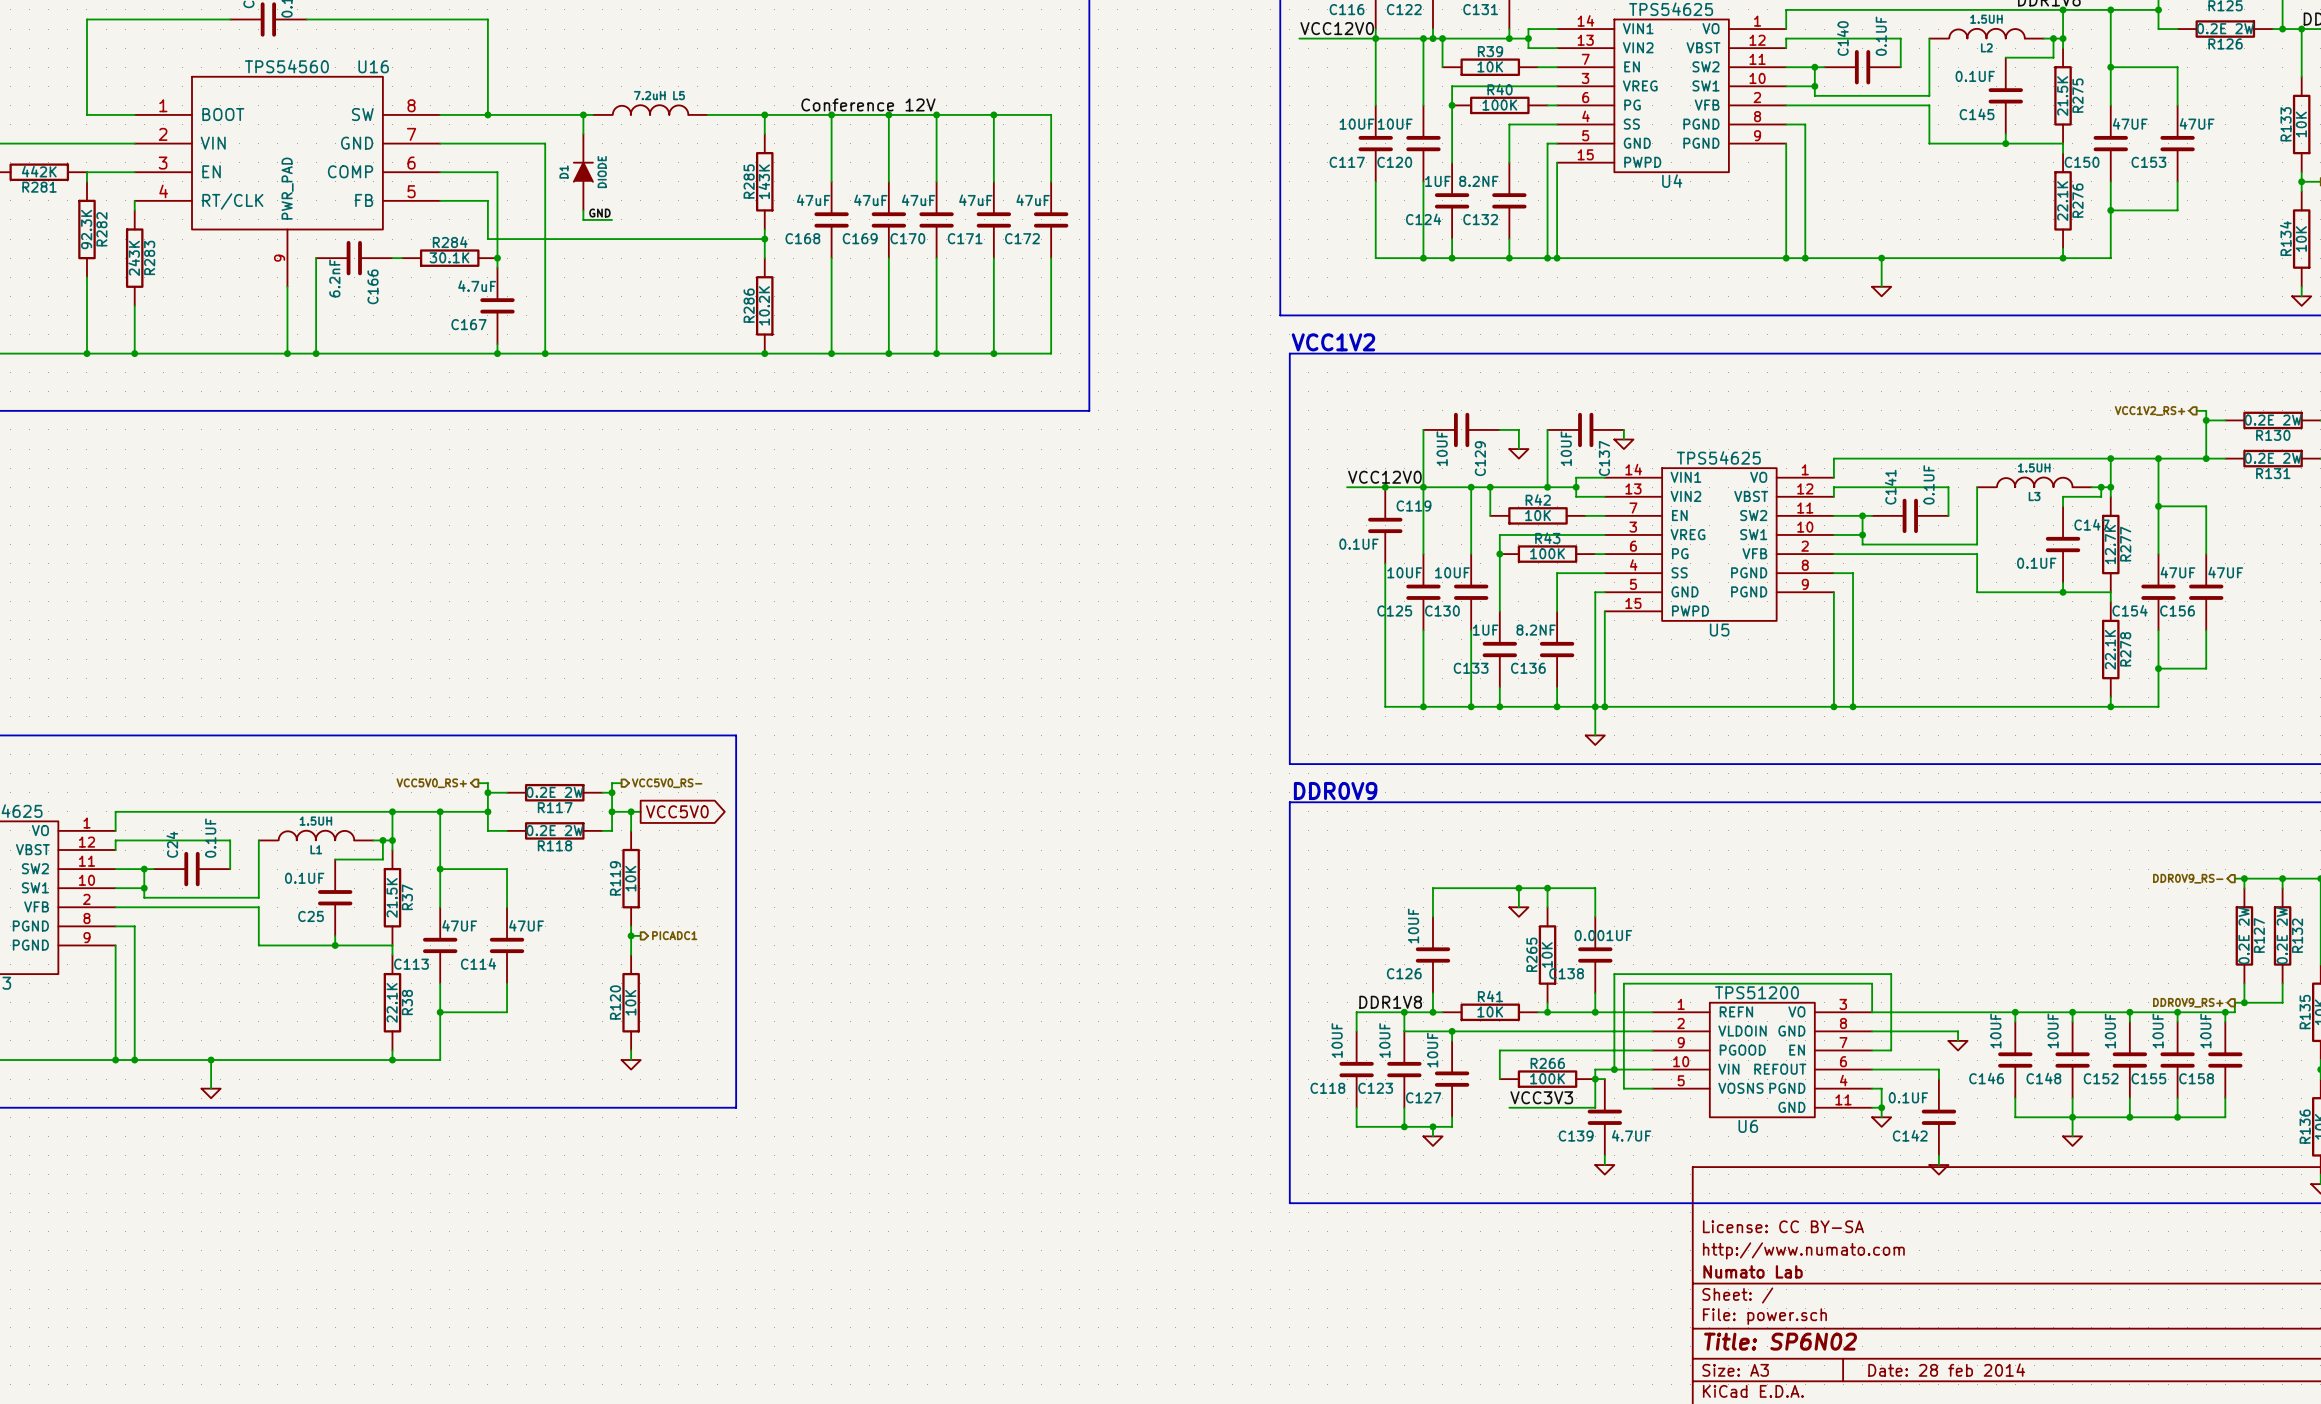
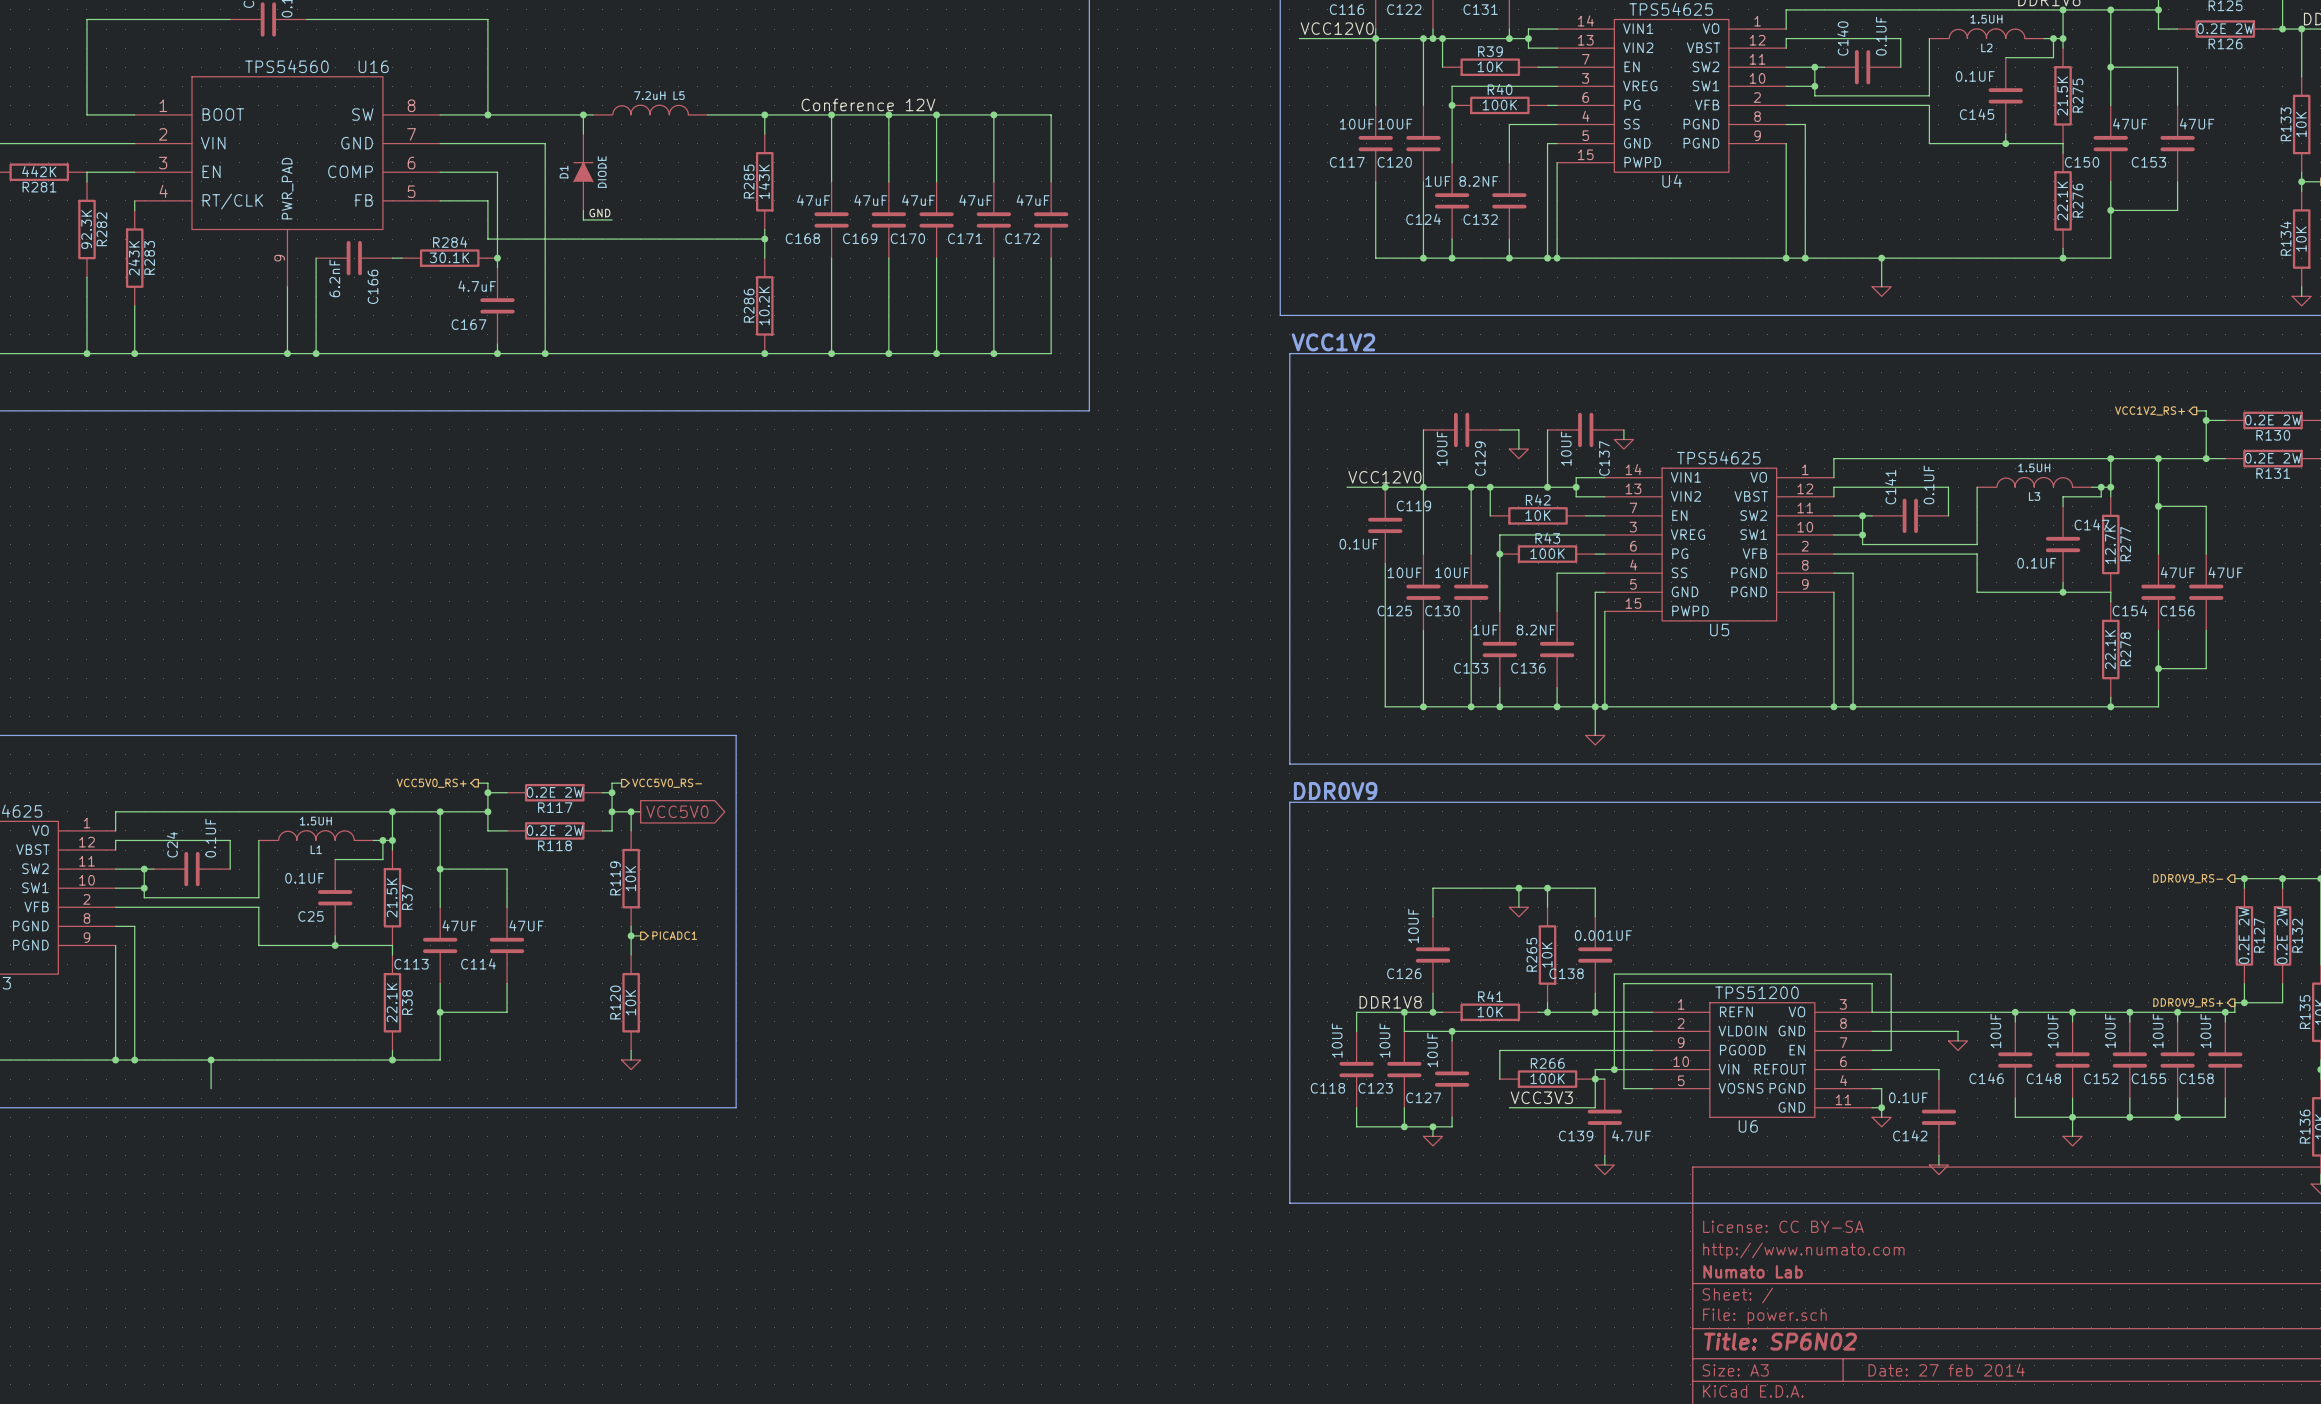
power symbol: (211, 1093) -> none
title block: Date: 28 feb 2014 (1946, 1370) -> Date: 27 feb 2014 (1946, 1370)

